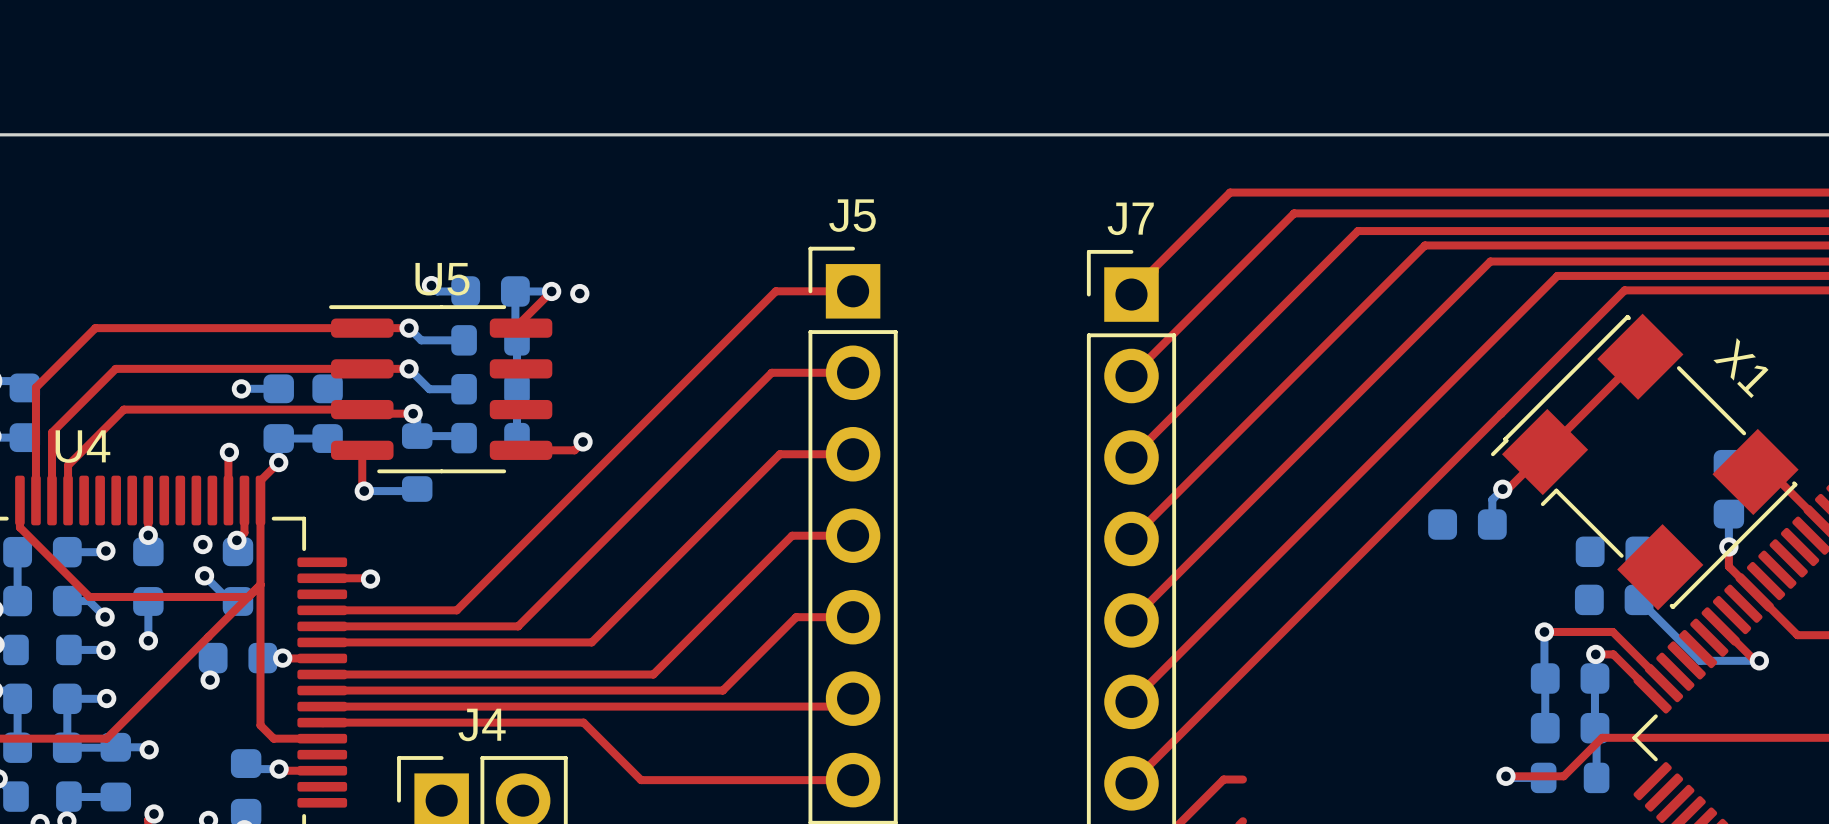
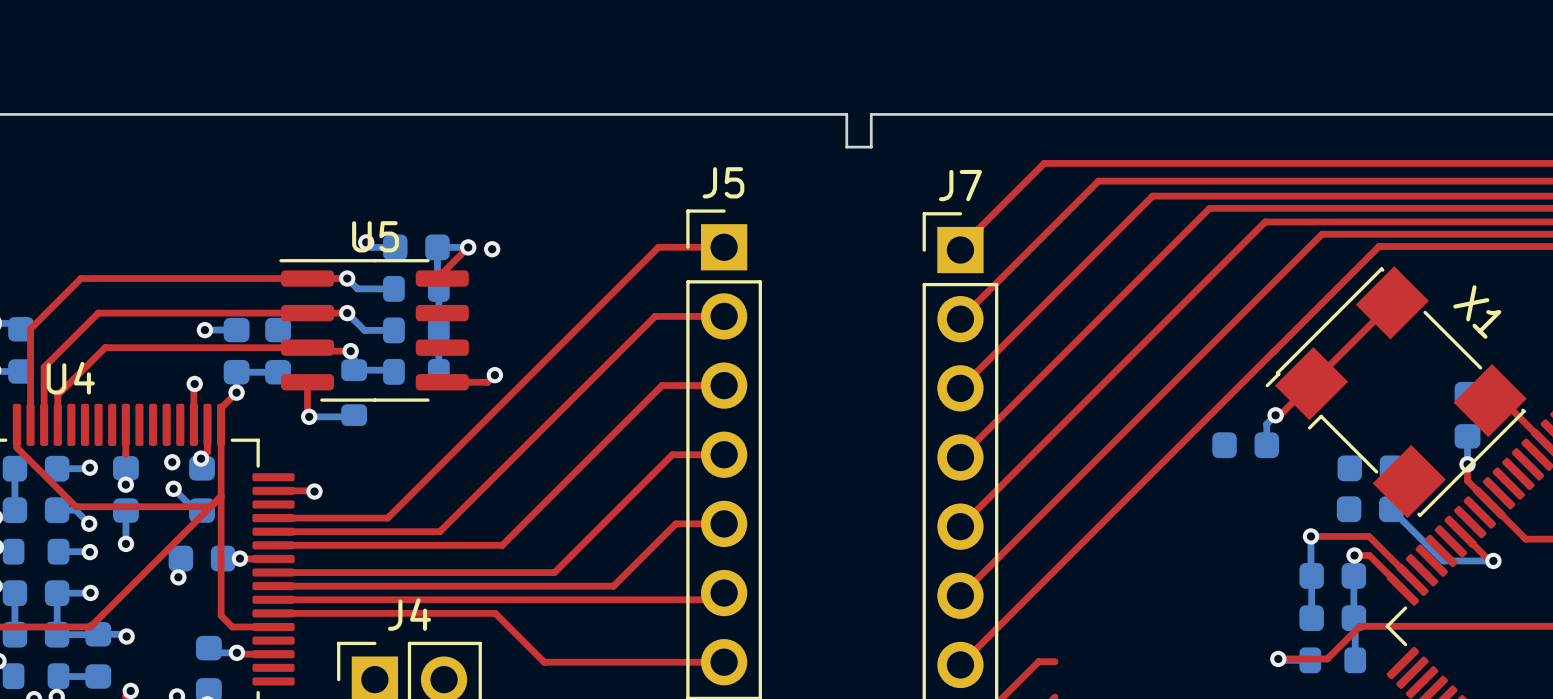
board edge: (997, 134) (1026, 134) -> (846, 114) (846, 147) (871, 147) (871, 114)
via position: (148, 535) -> (125, 484)

